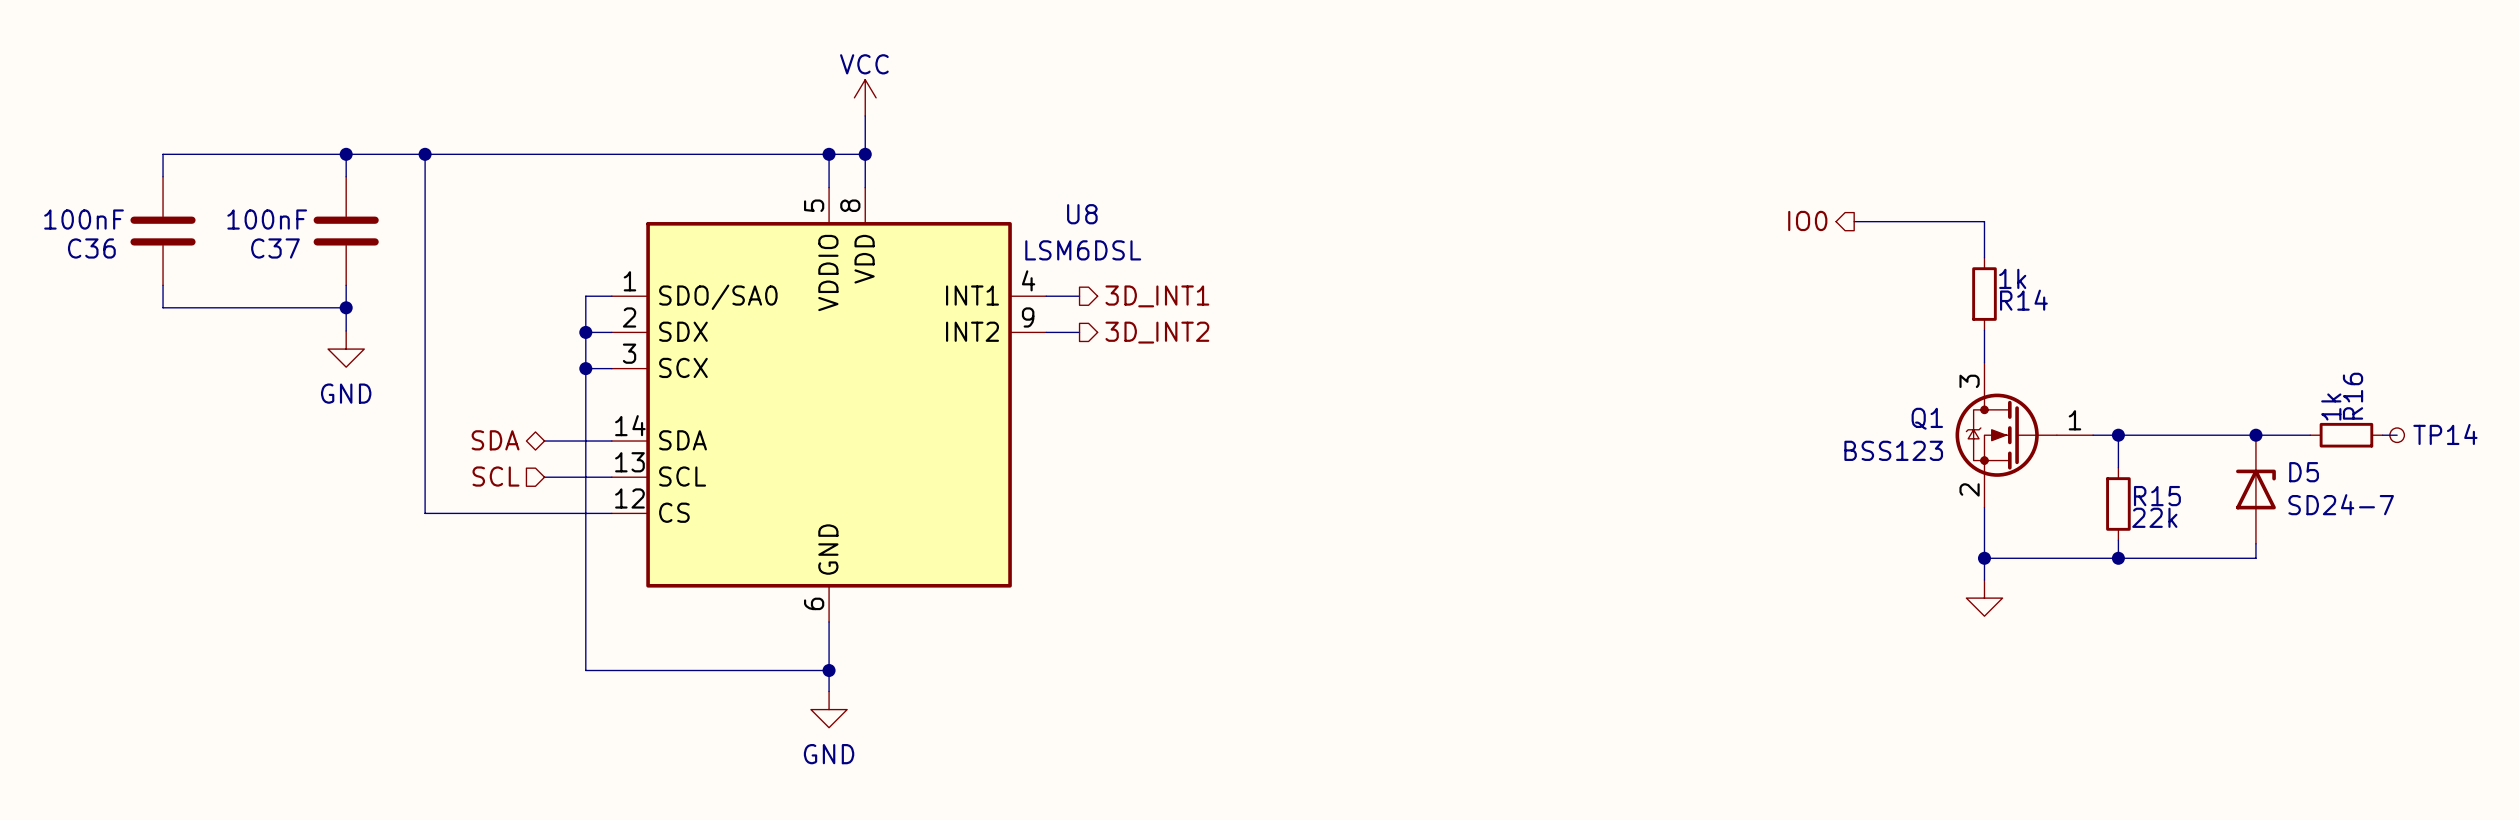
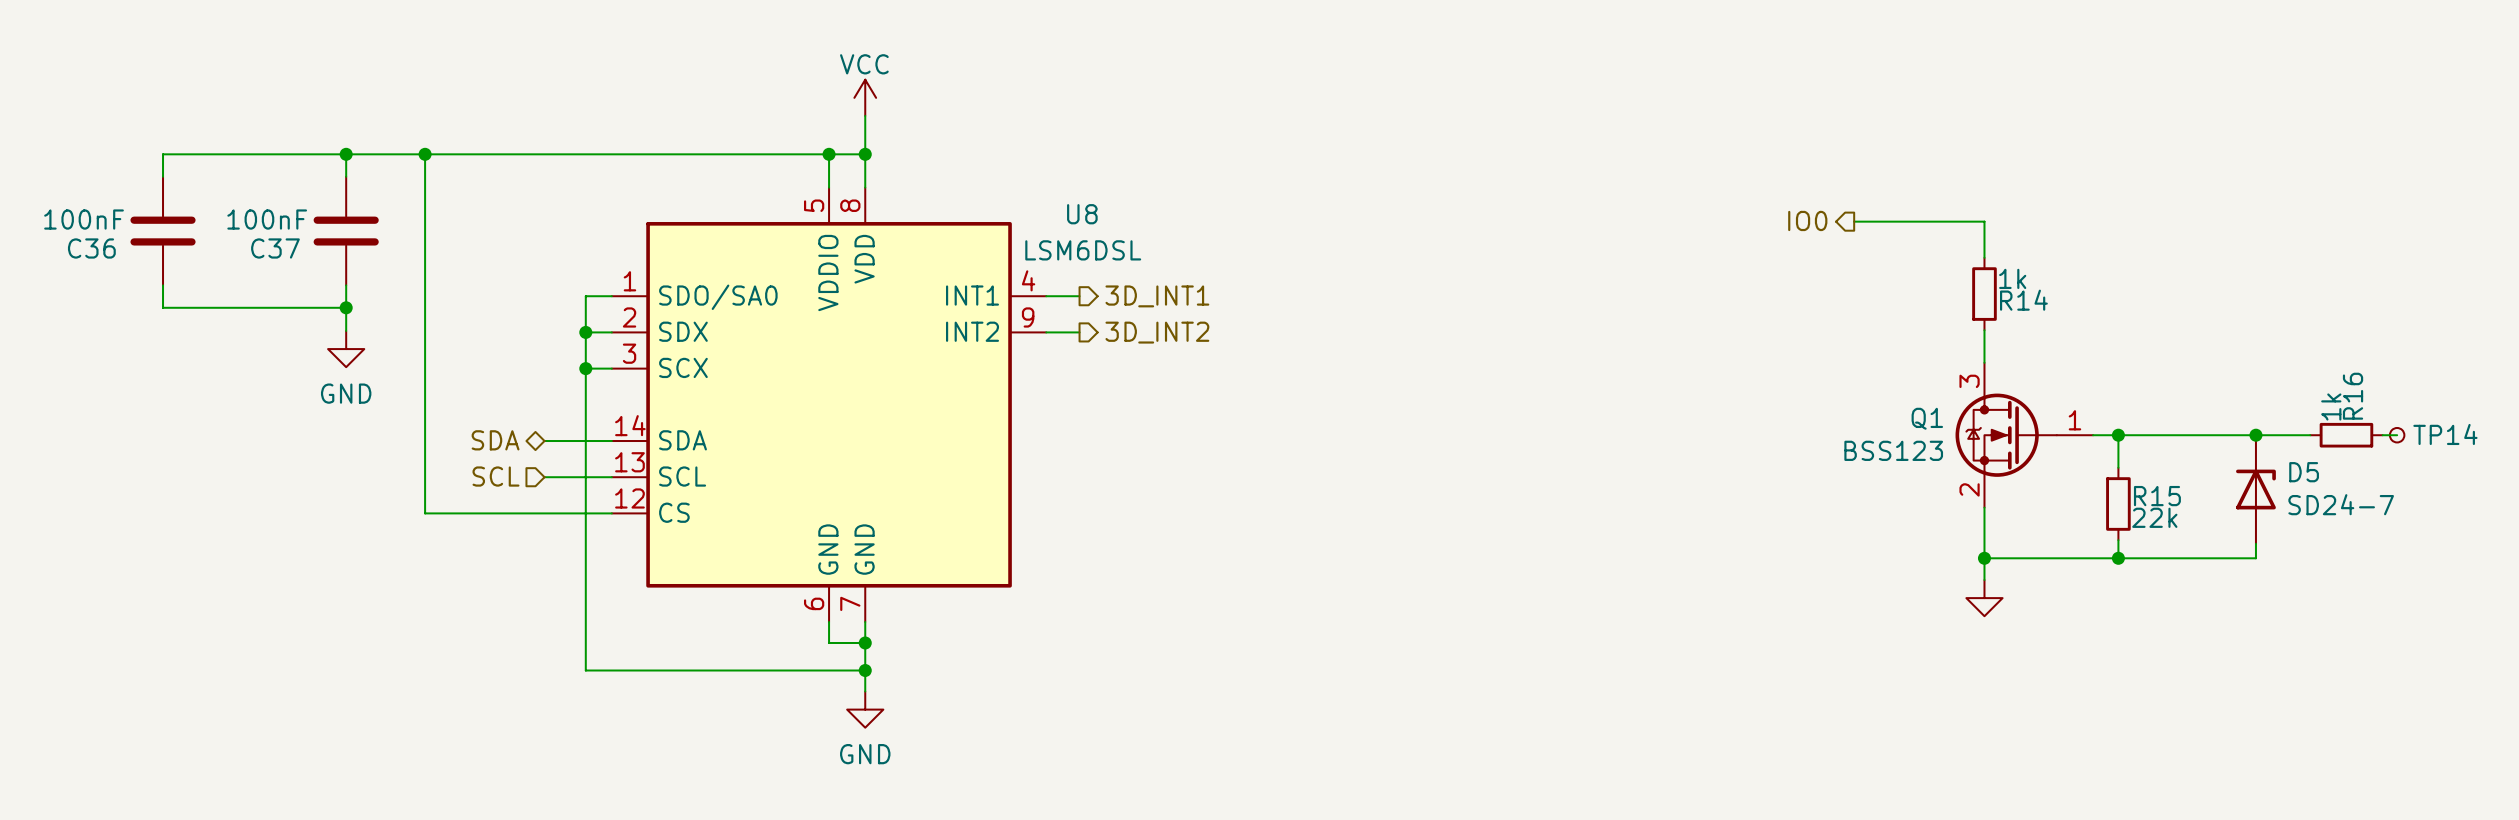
U8 symbol: [611, 187, 1047, 622] -> [611, 187, 1047, 622]
wire: none -> (865, 621) (865, 691)
wire: (829, 642) (829, 691) -> (829, 642) (865, 642)
junction: none -> (865, 642)
wire: none -> (829, 670) (865, 670)
junction: (829, 670) -> none
junction: none -> (865, 670)
power symbol position: GND (829, 709) -> GND (865, 709)

